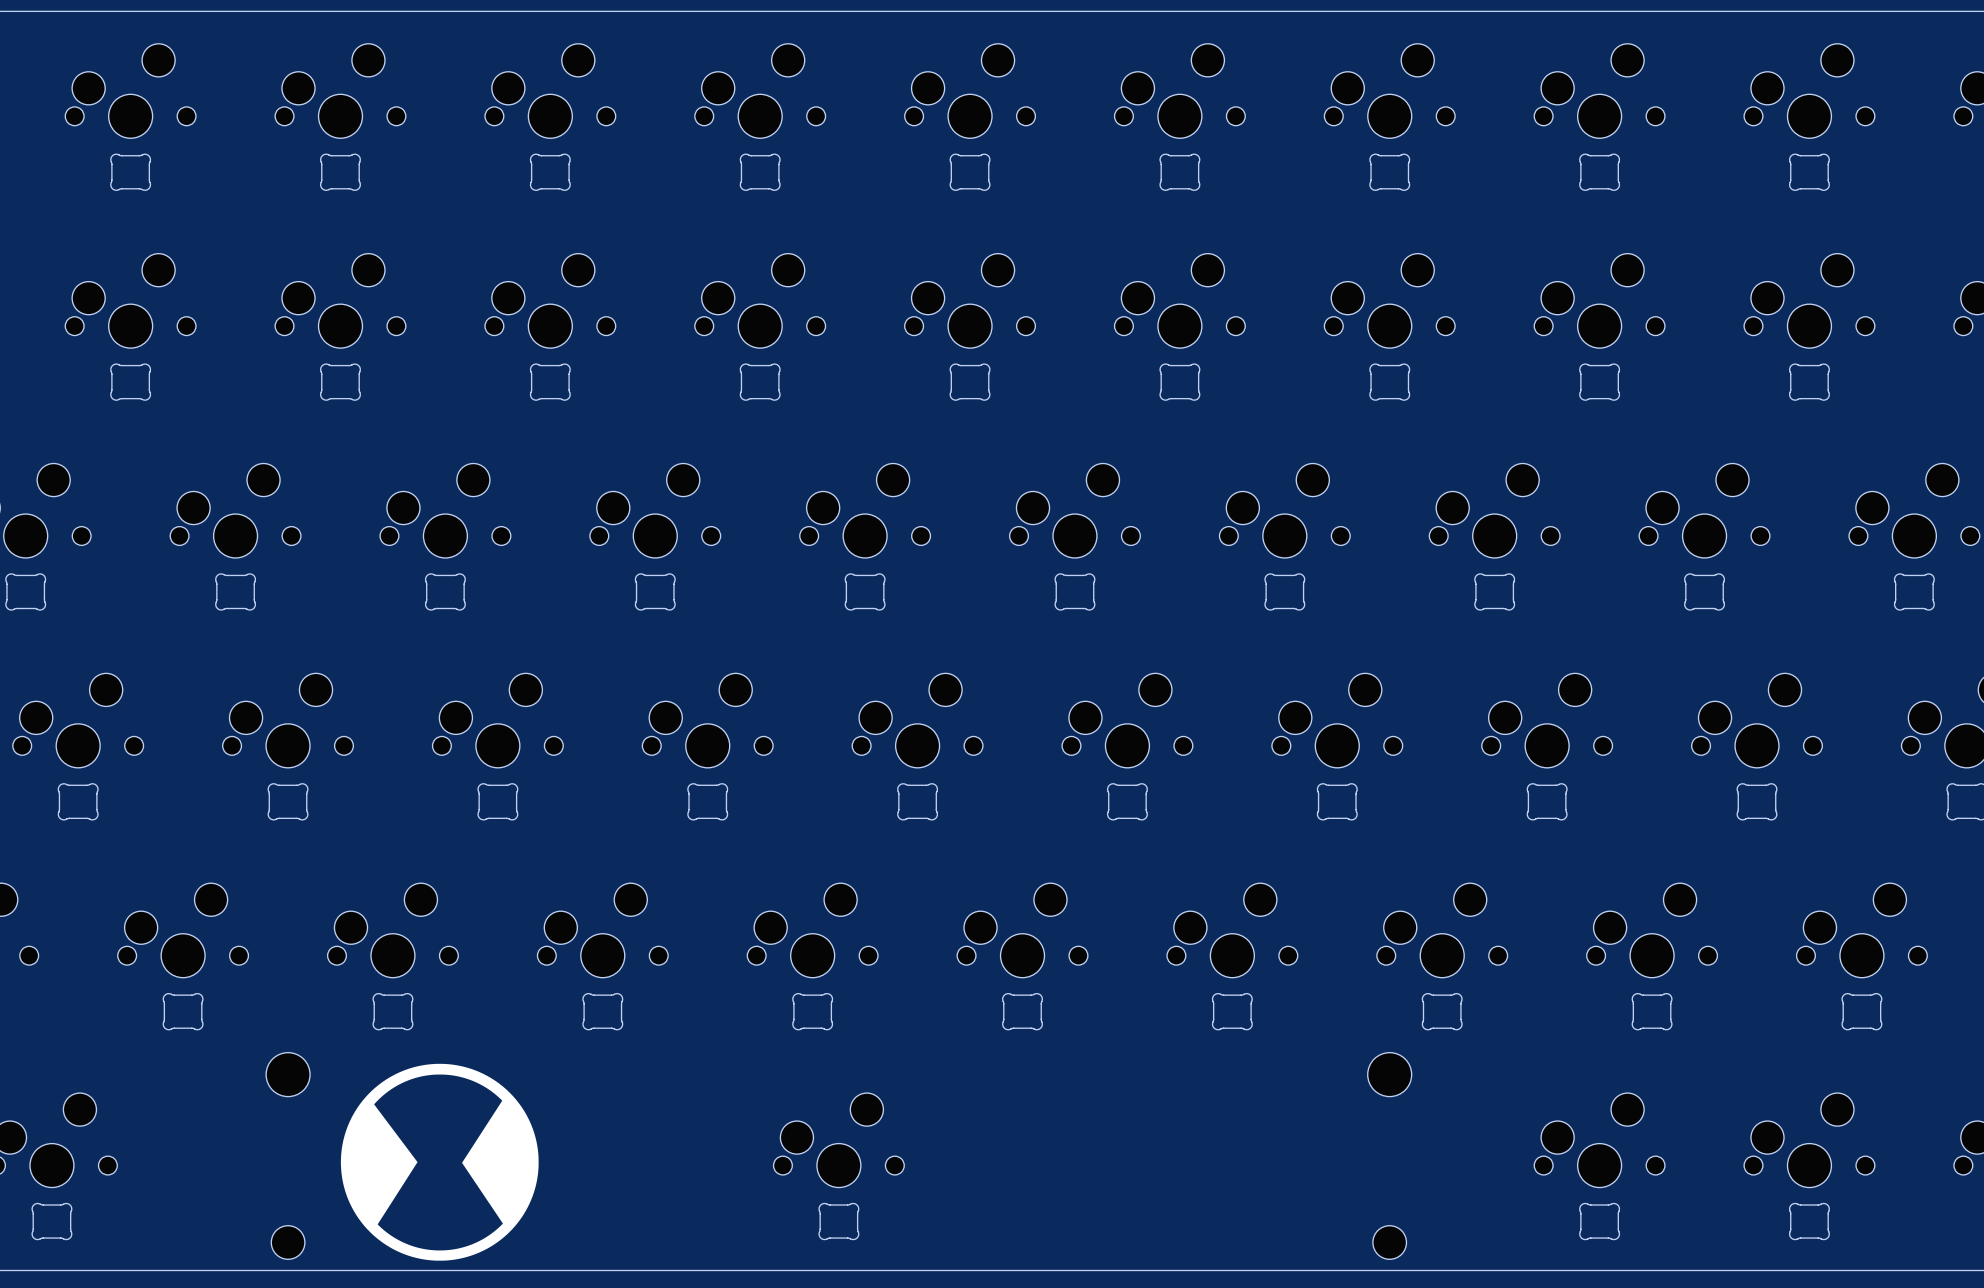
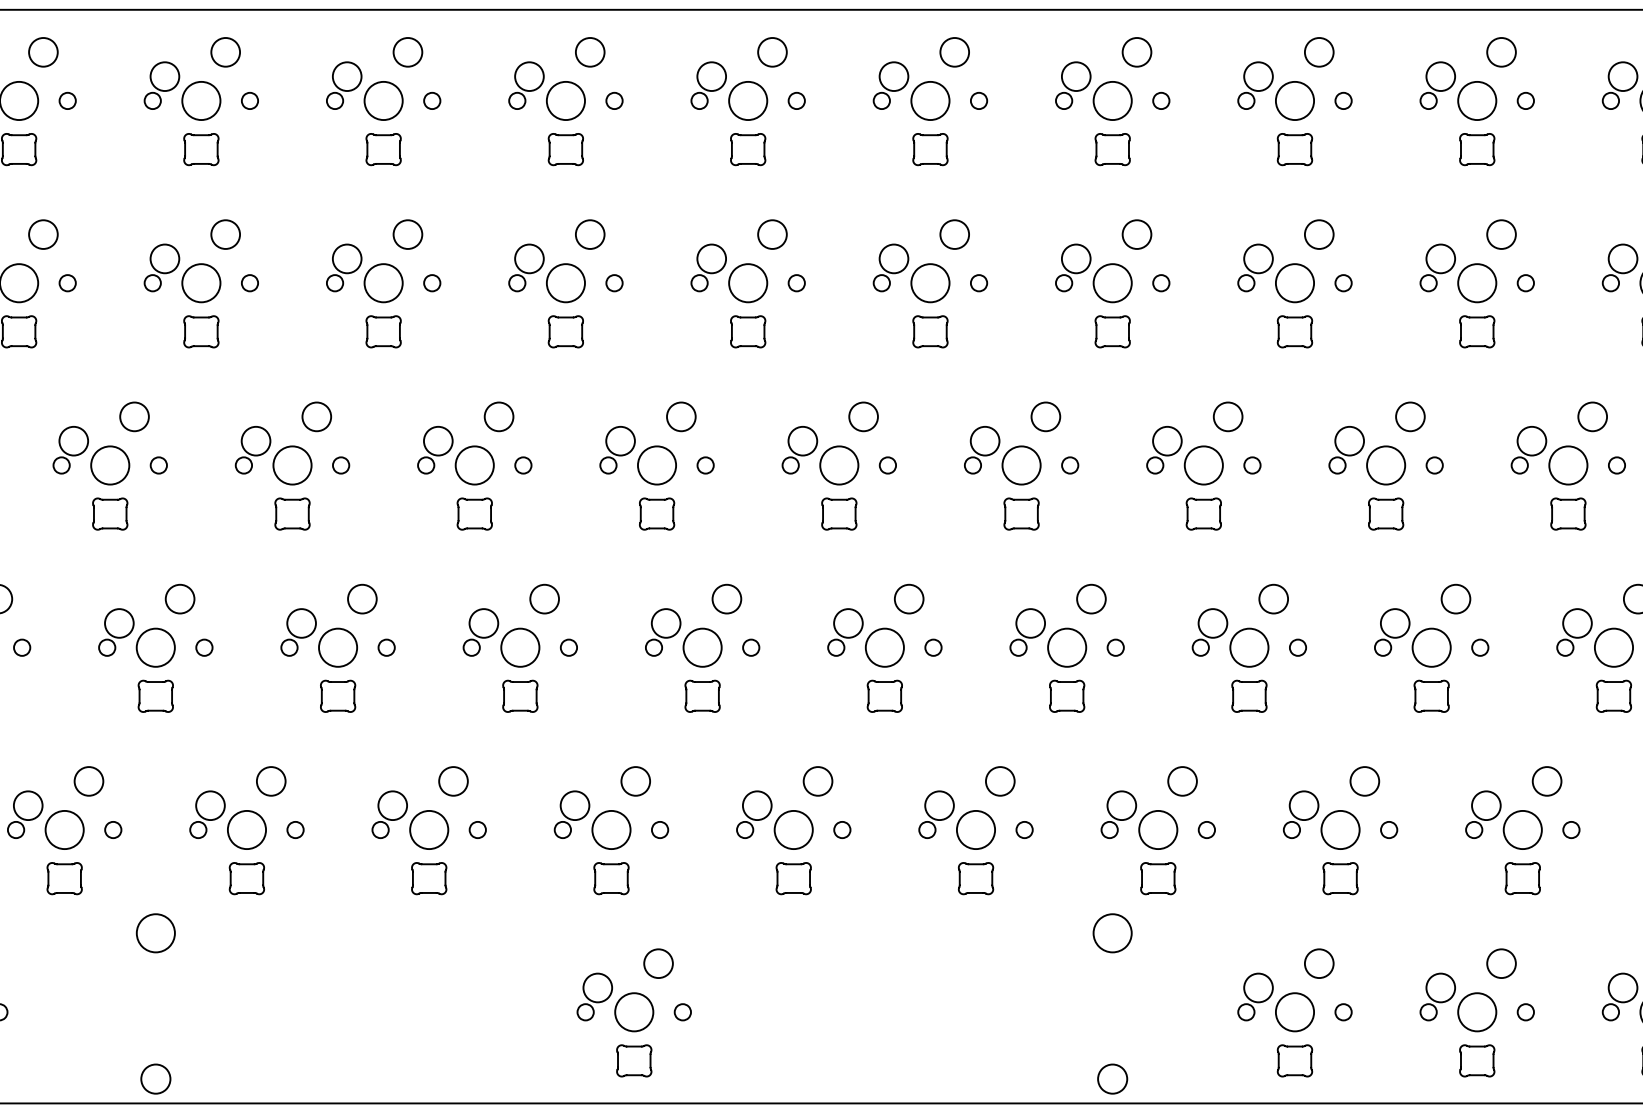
drawing: [340, 1063, 539, 1261] -> none

